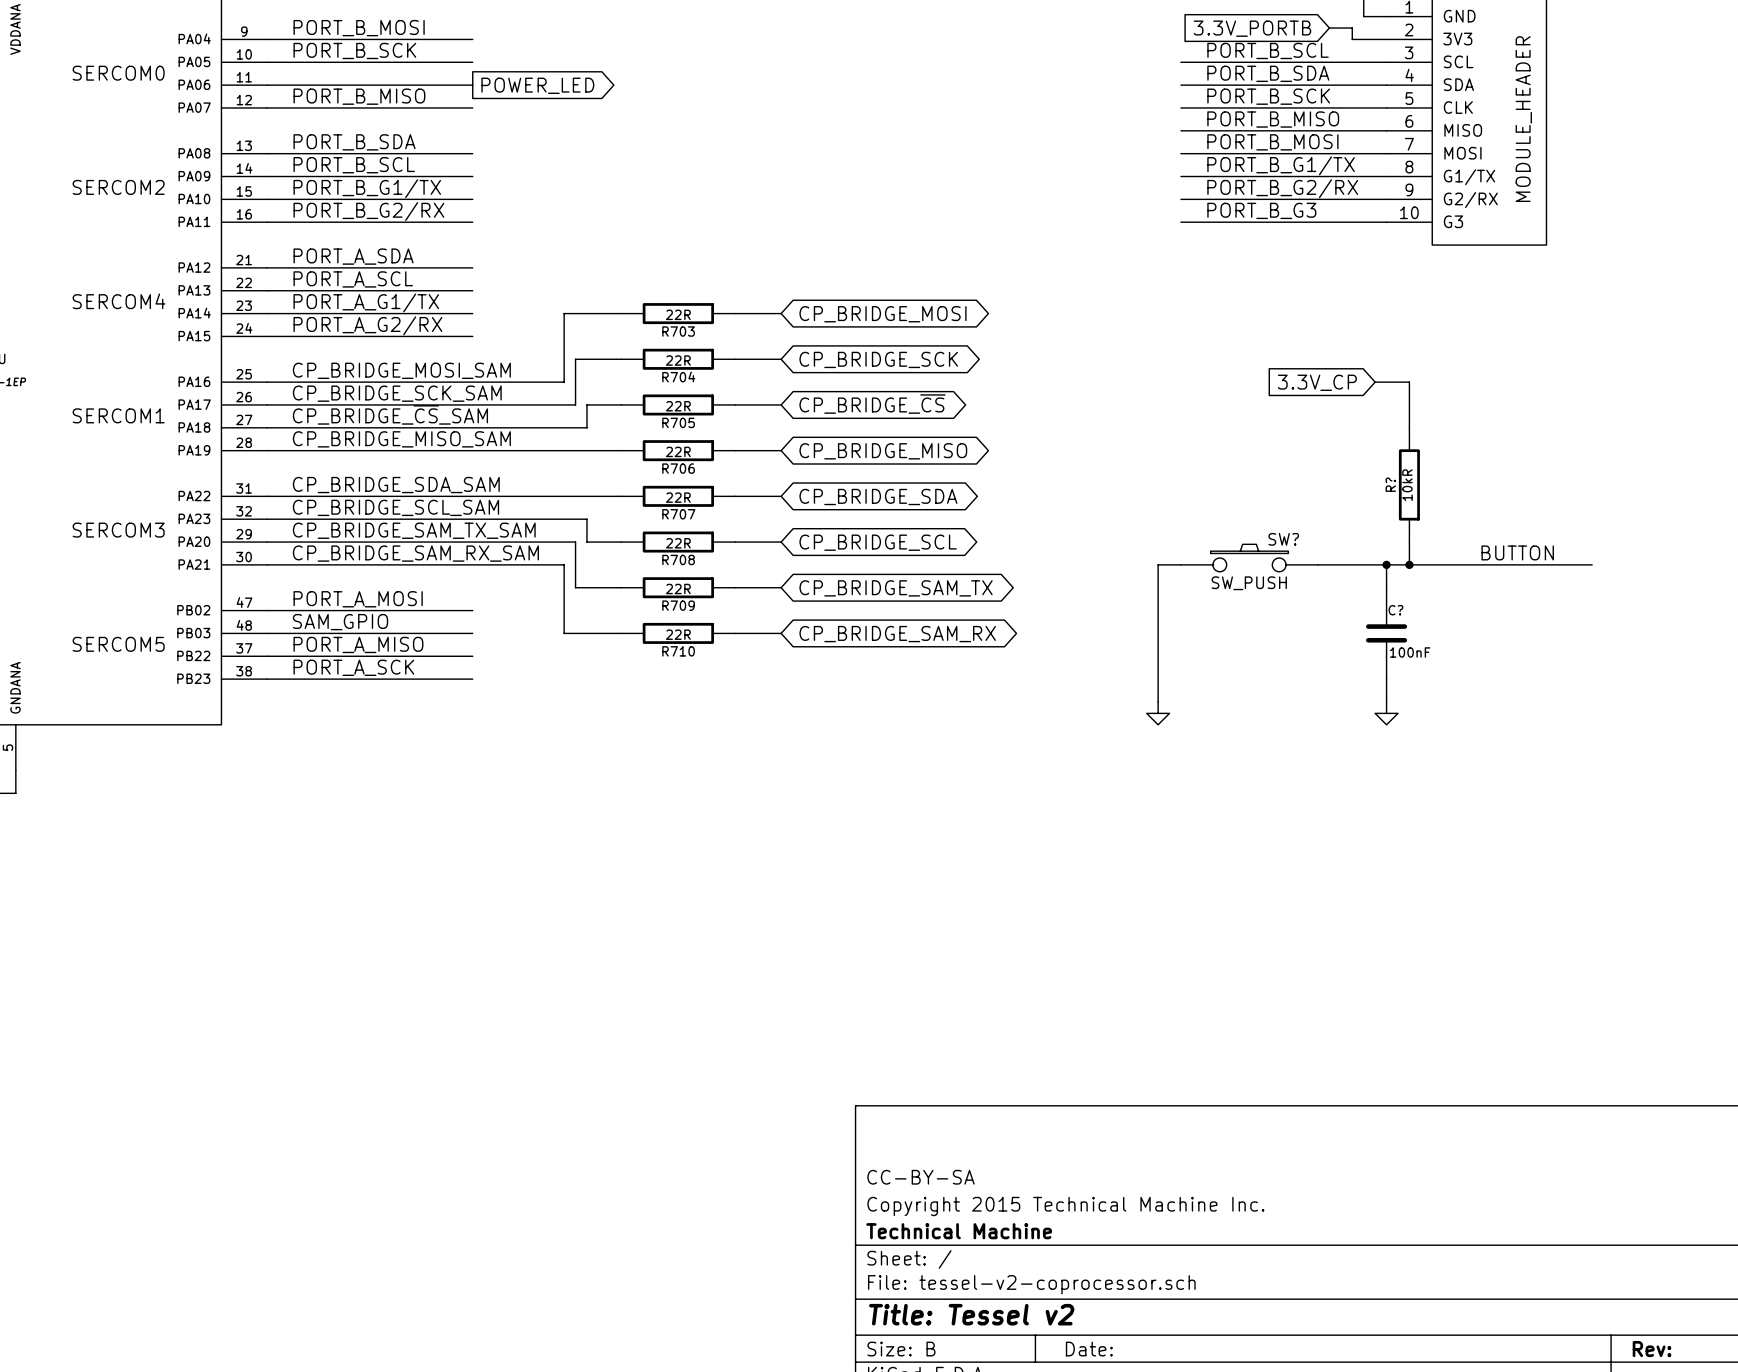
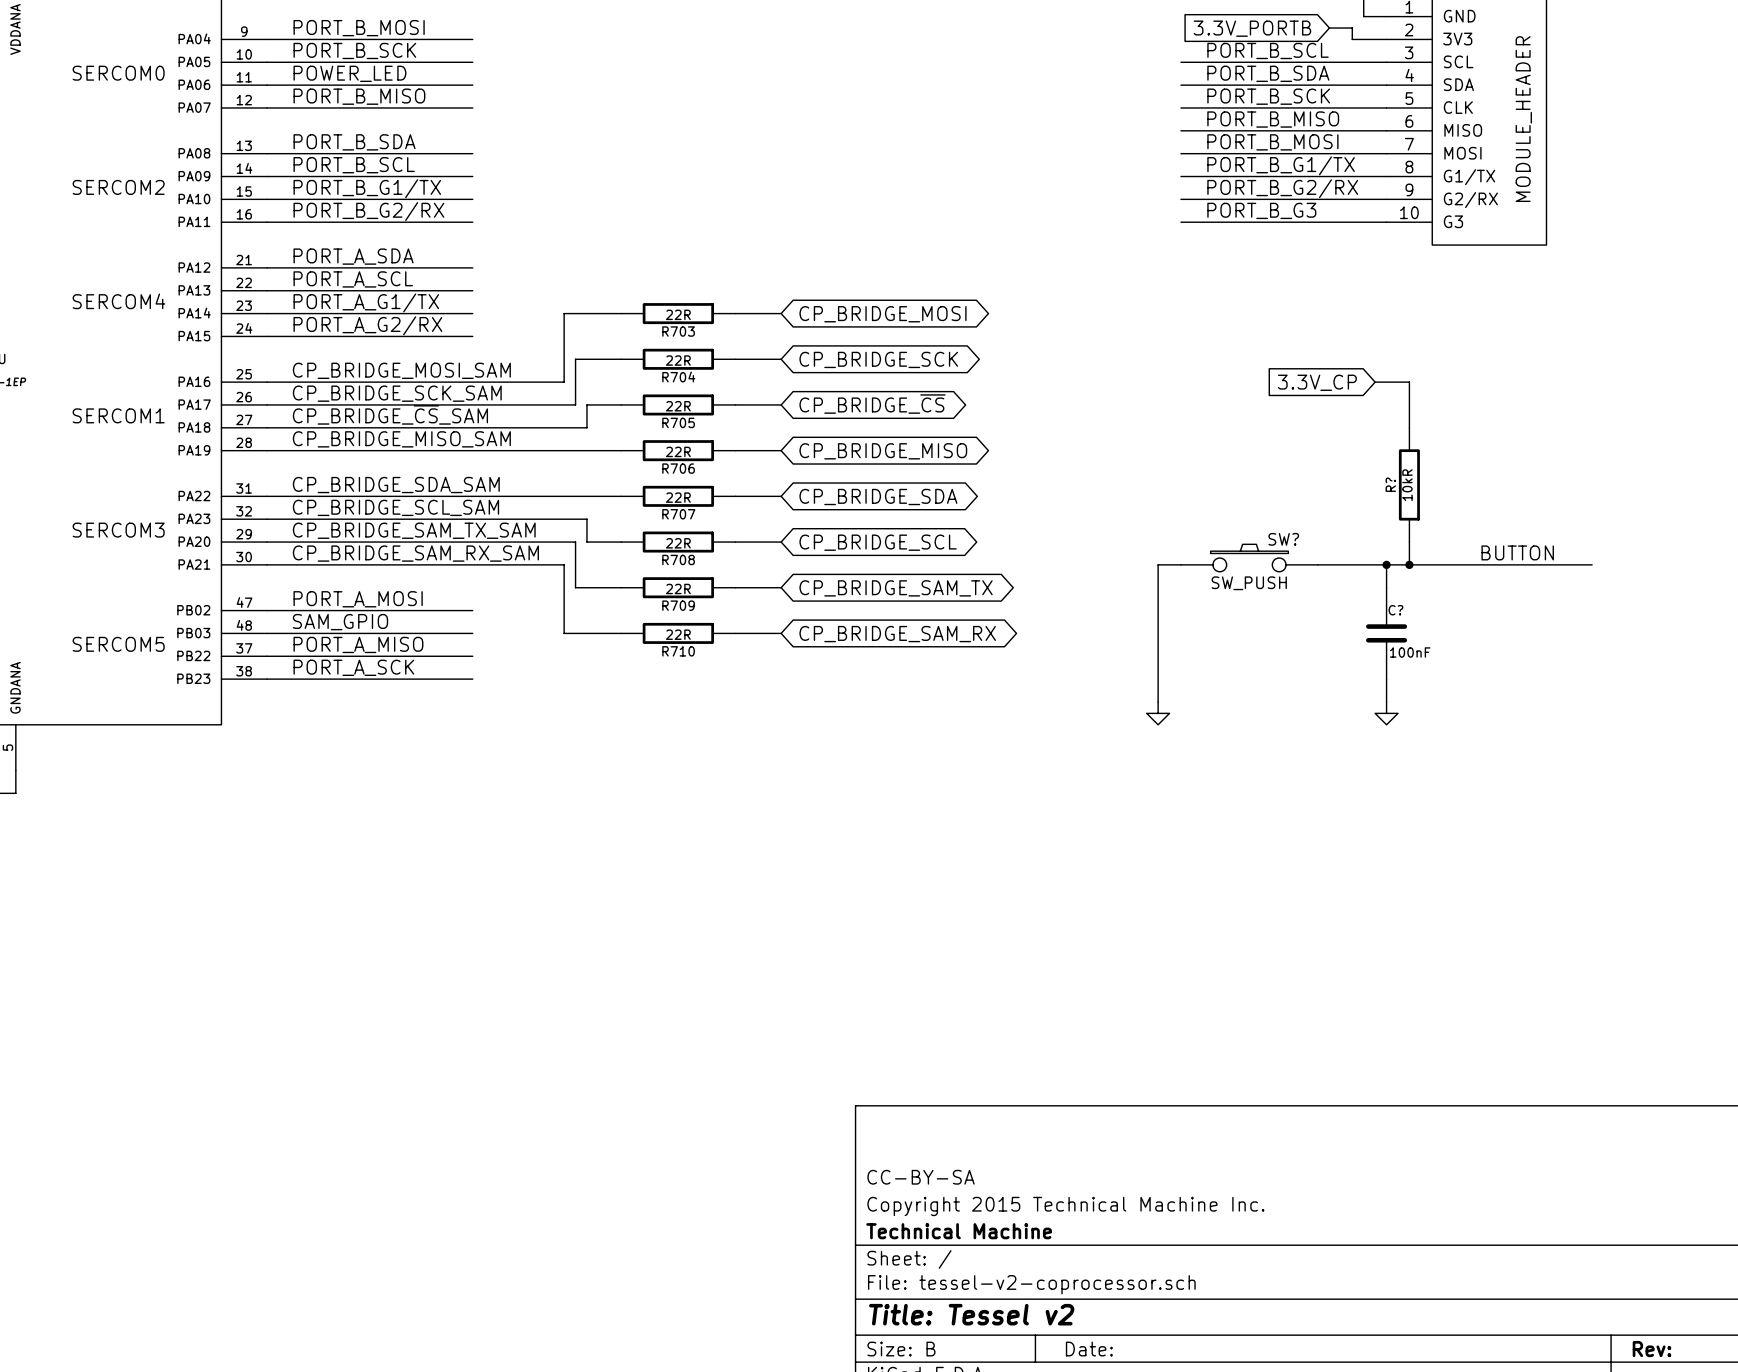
label: none -> POWER_LED (349, 73)
global label: POWER_LED (537, 85) -> none

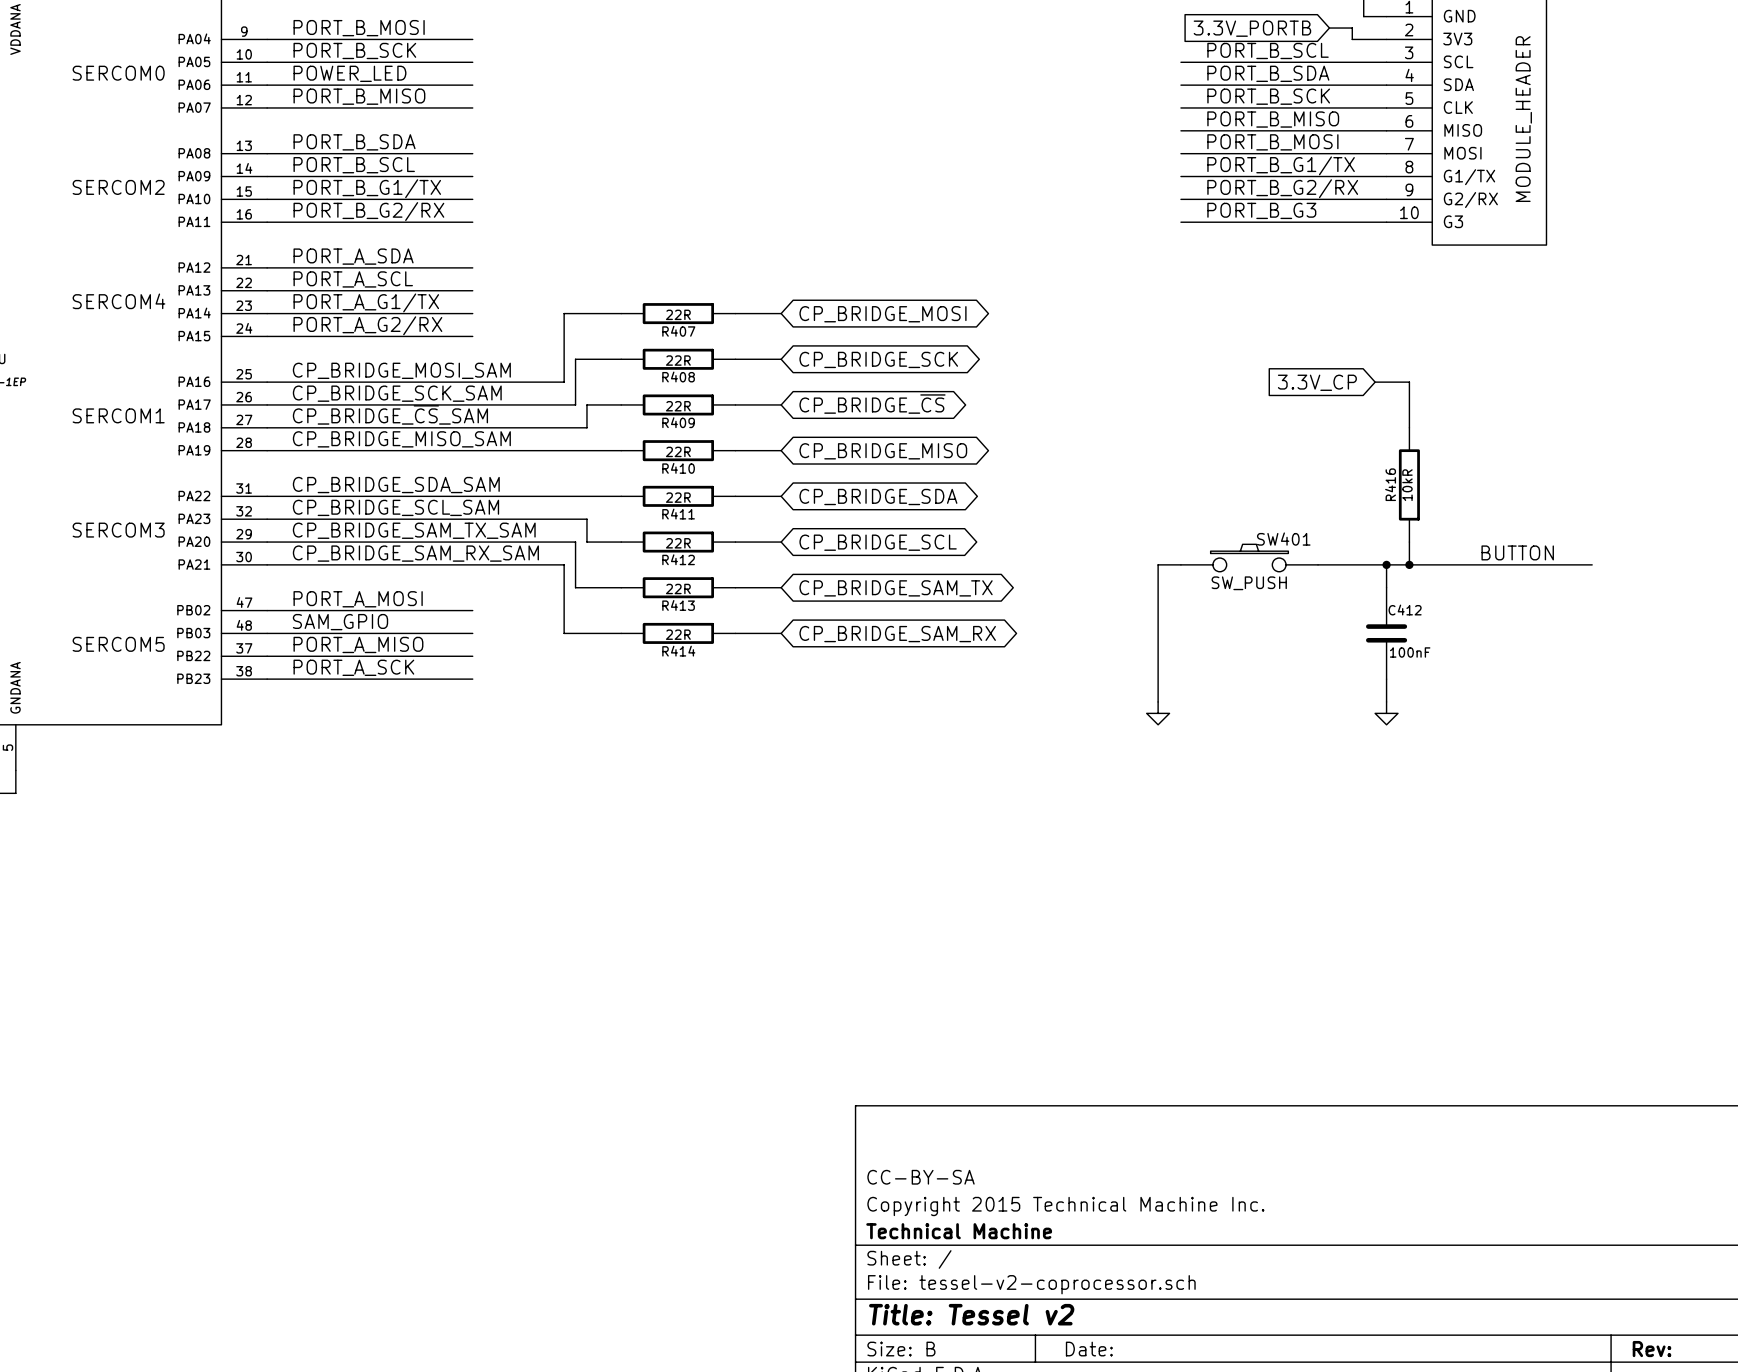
R703 name: R703 (678, 331) -> R407 (678, 331)
R704 name: R704 (678, 376) -> R408 (678, 376)
R705 name: R705 (678, 422) -> R409 (678, 422)
R706 name: R706 (678, 468) -> R410 (678, 468)
R? name: R? (1390, 484) -> R416 (1390, 484)
R707 name: R707 (678, 514) -> R411 (678, 514)
SW? name: SW? (1283, 539) -> SW401 (1283, 539)
R708 name: R708 (678, 559) -> R412 (678, 559)
R709 name: R709 (678, 605) -> R413 (678, 605)
C? name: C? (1395, 610) -> C412 (1405, 610)
R710 name: R710 (678, 651) -> R414 (678, 651)

